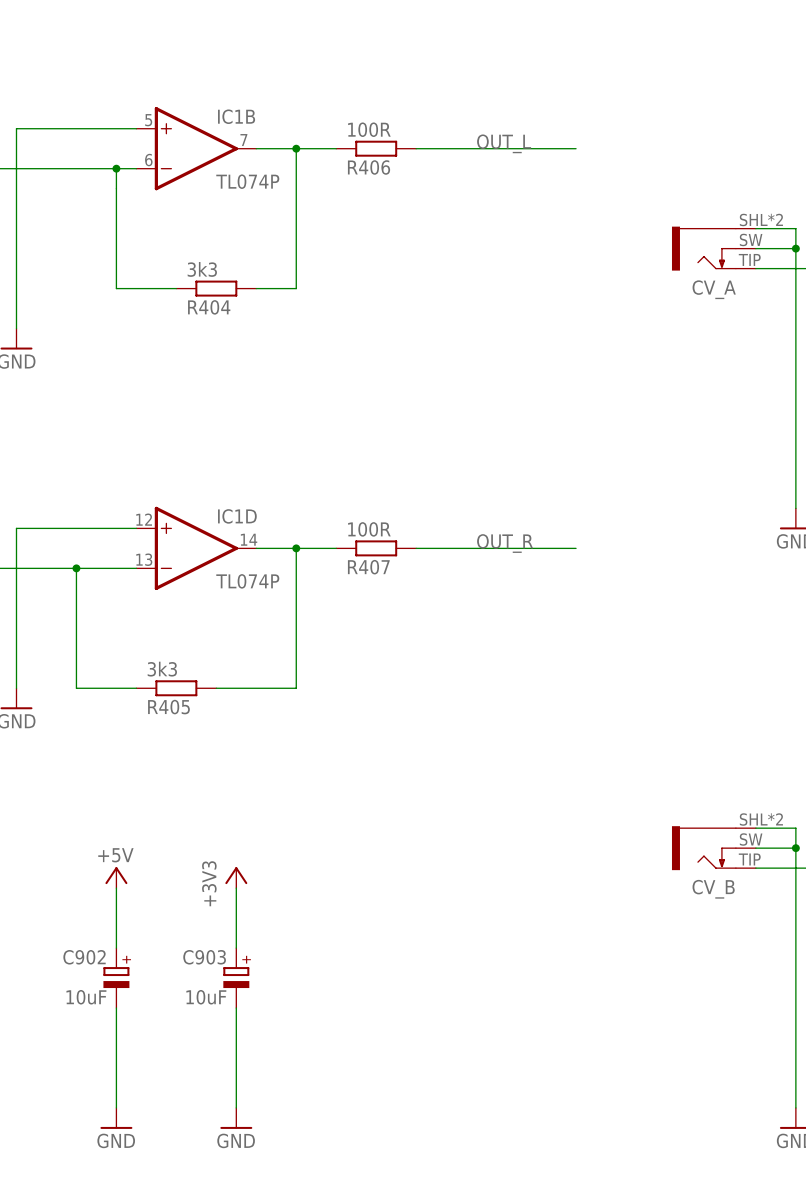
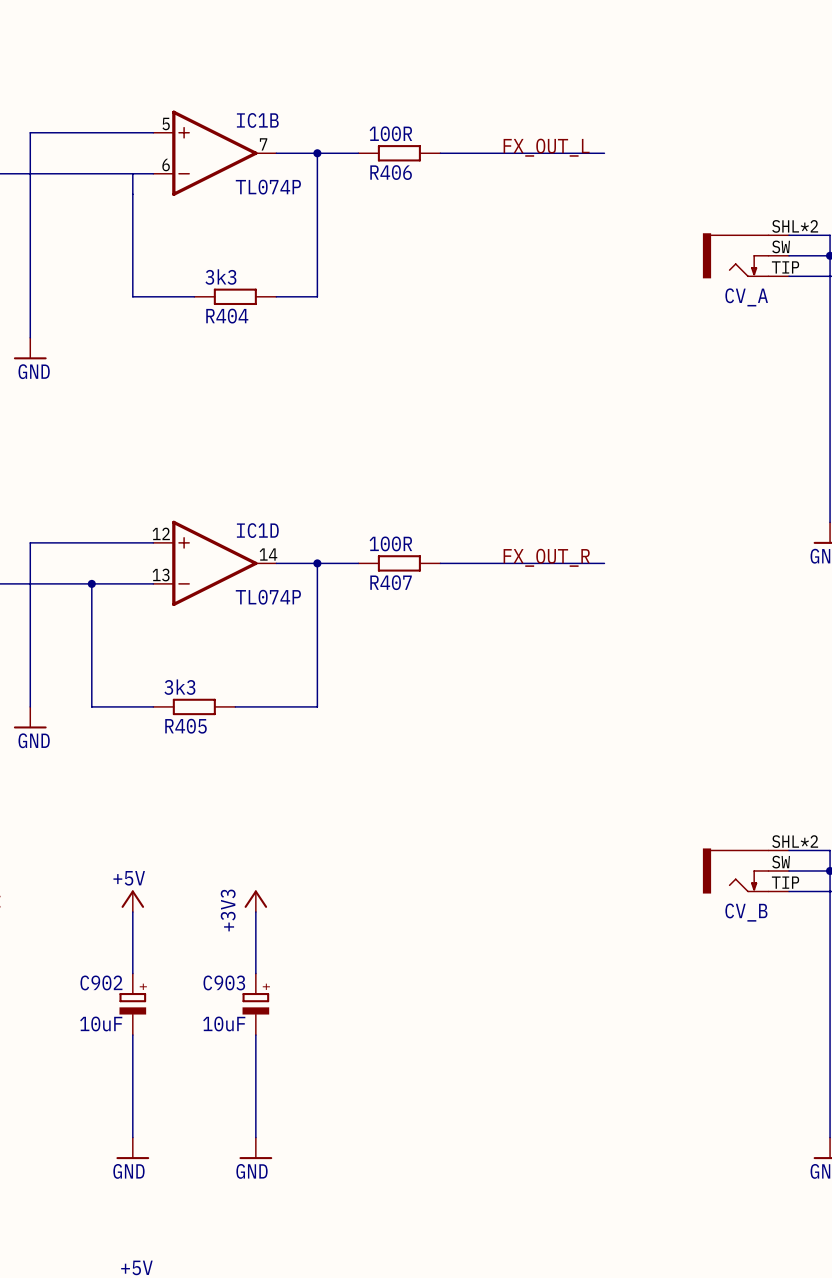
label: OUT_L (504, 143) -> FX_OUT_L (546, 147)
junction: (116, 168) -> none
label: OUT_R (505, 543) -> FX_OUT_R (546, 557)

